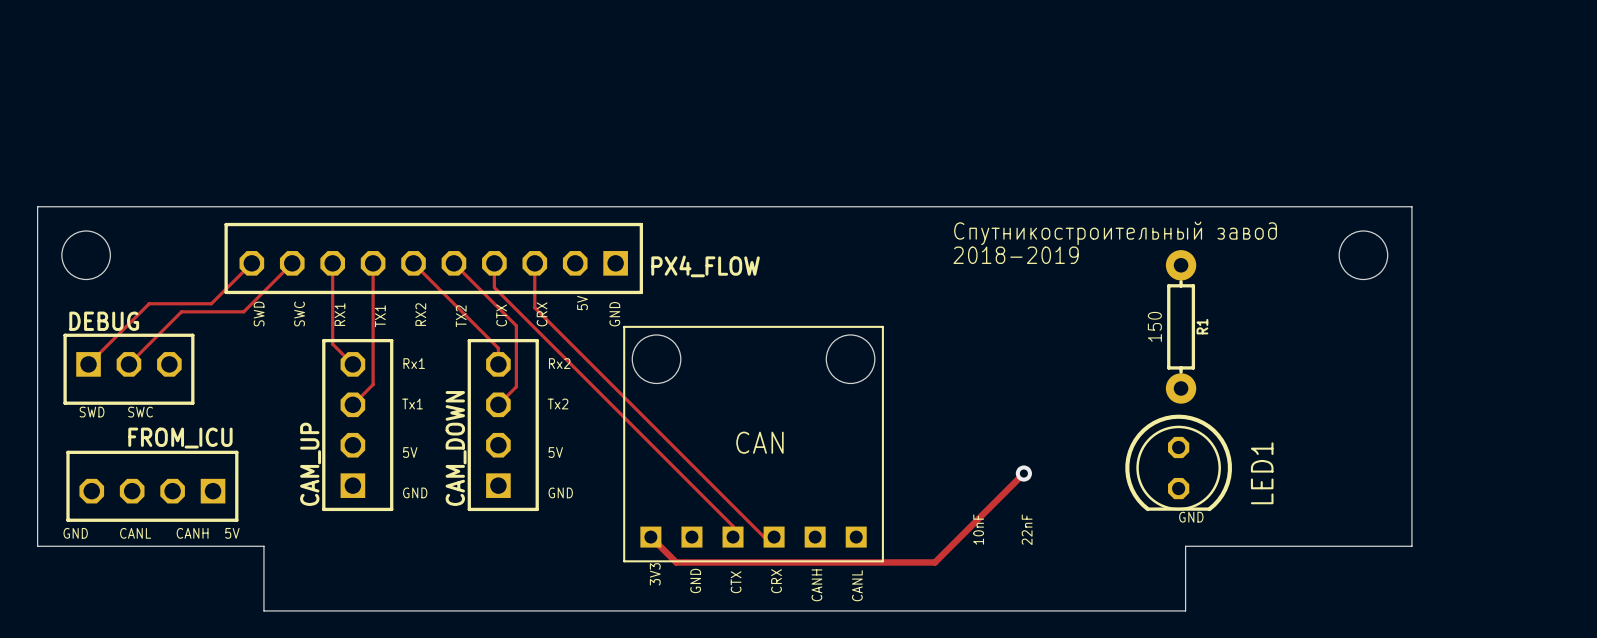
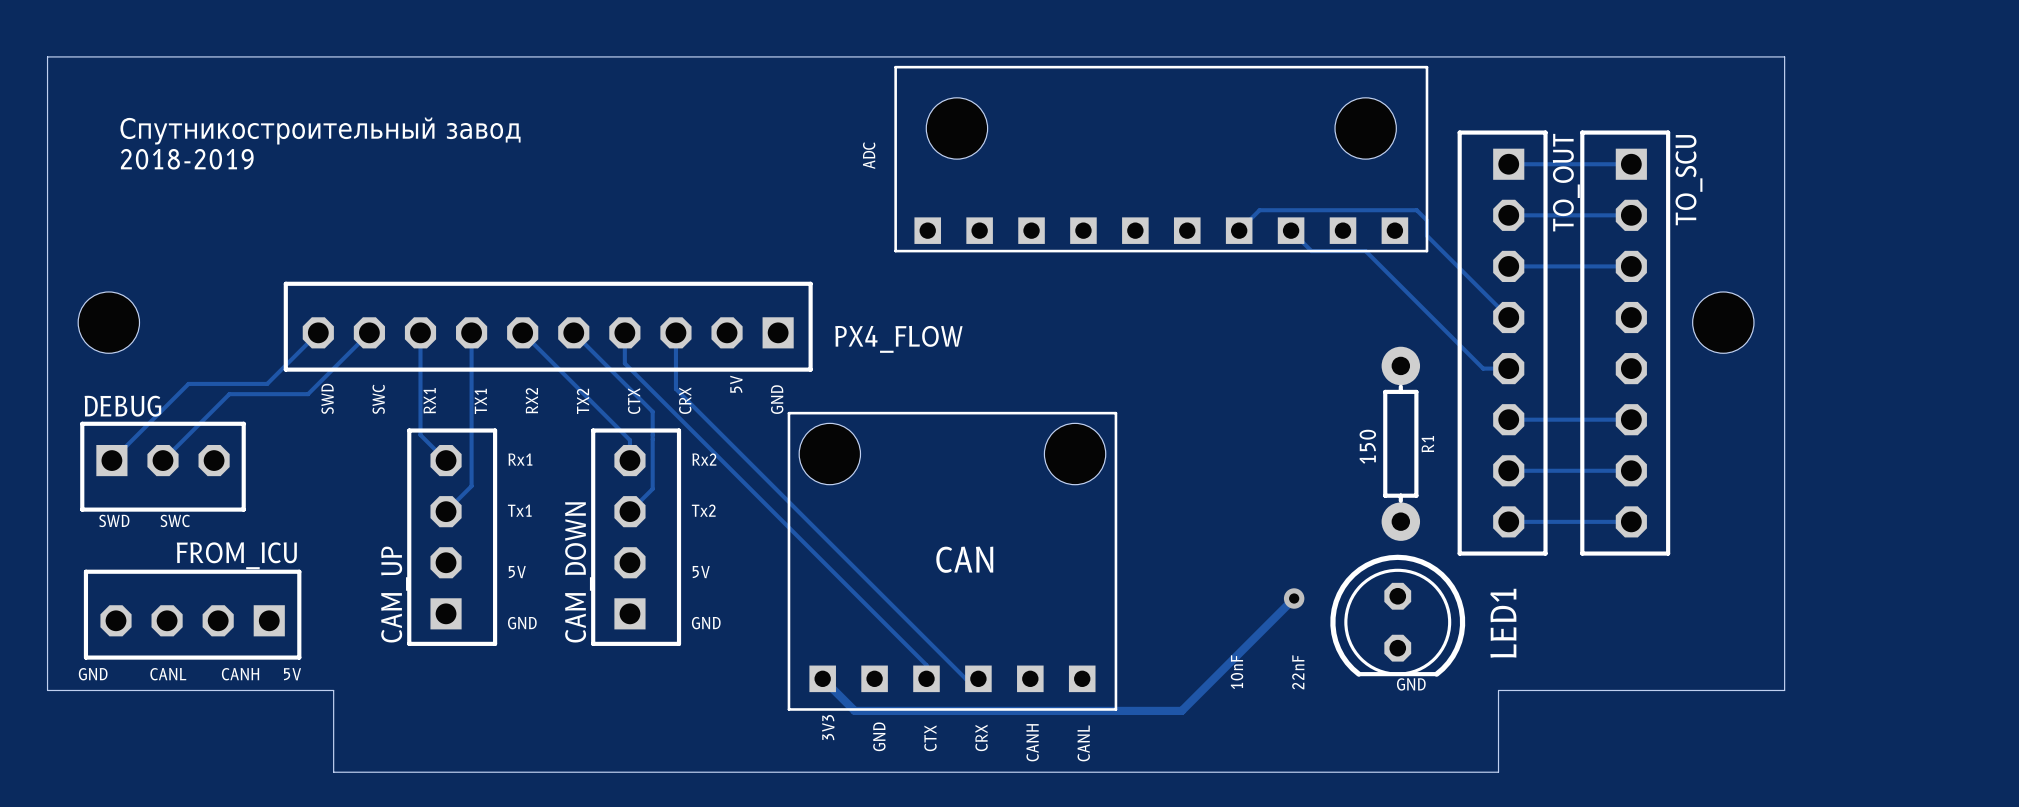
text: none -> Спутникостроительный завод (320, 131)
text: none -> ADC (869, 155)
text: none -> 2018-2019 (187, 159)
part: none -> (1161, 159)
track: none -> (1508, 164) (1631, 164)
track: none -> (1508, 215) (1631, 215)
track: none -> (1239, 230) (1259, 210) (1416, 210) (1426, 220) (1426, 235) (1508, 317)
track: none -> (1291, 230) (1311, 251) (1365, 251) (1483, 368) (1508, 368)
board edge: (37, 206) (1411, 206) -> (47, 261) (47, 56) (1784, 56) (1784, 261)
track: none -> (1508, 266) (1631, 266)
text: Спутникостроительный завод (1115, 233) -> none
text: 2018-2019 (1016, 255) -> none
TO_OUT: none -> (1502, 343)
TO_SCU: none -> (1625, 343)
text position: 150 (1154, 326) -> 150 (1367, 446)
R1 position: (1181, 326) -> (1400, 443)
track: none -> (1508, 419) (1631, 419)
track: none -> (1508, 470) (1631, 470)
track: none -> (1508, 521) (1631, 521)
LED1 position: (1178, 462) -> (1397, 615)
text position: GND (1191, 517) -> GND (1411, 684)

